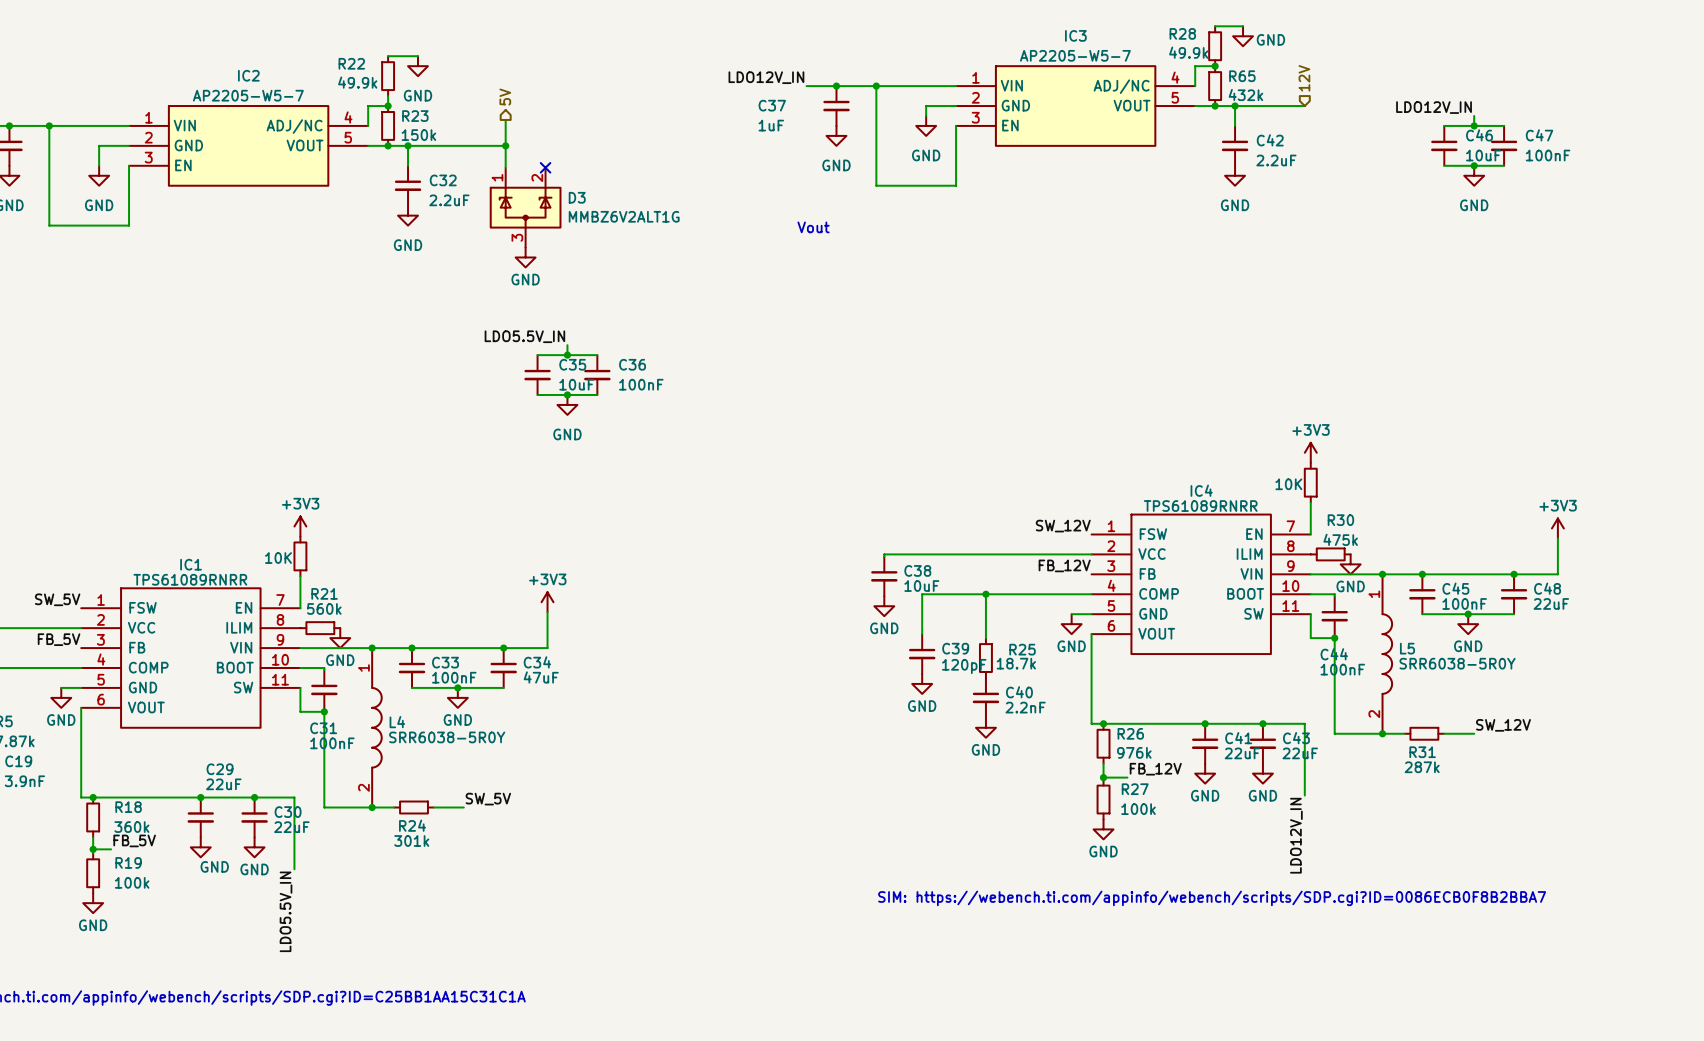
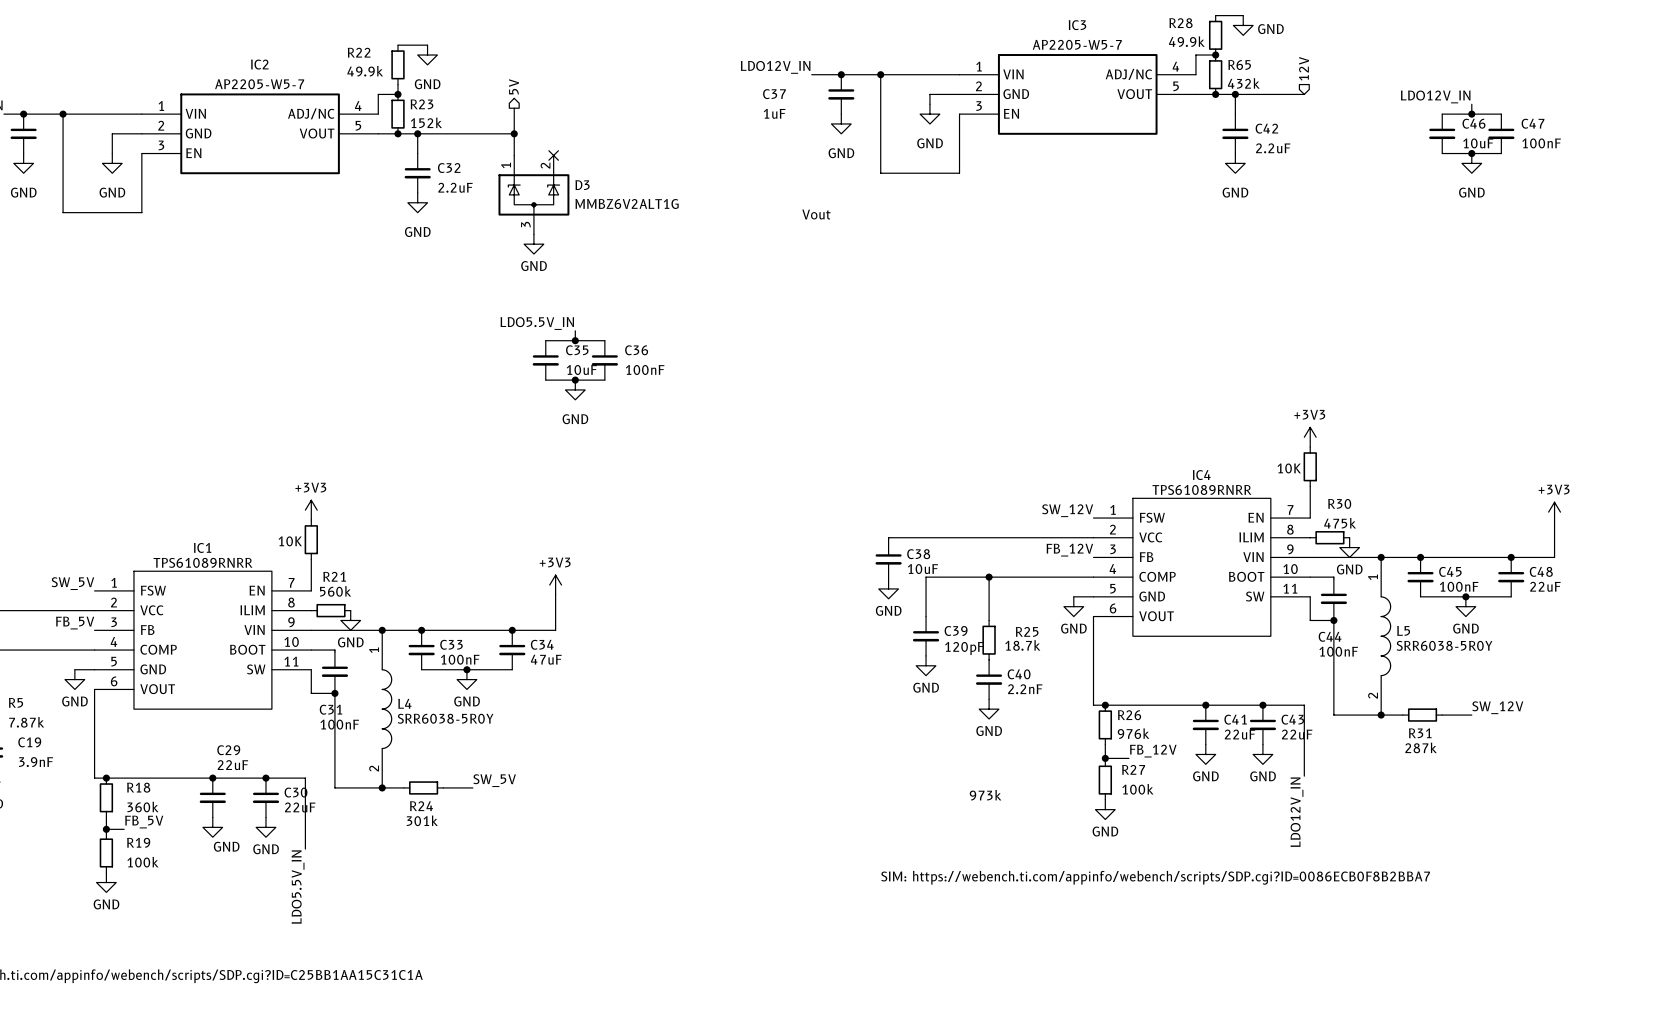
R23 value: 150k (418, 135) -> 152k (426, 122)
text: none -> 973k (985, 795)

